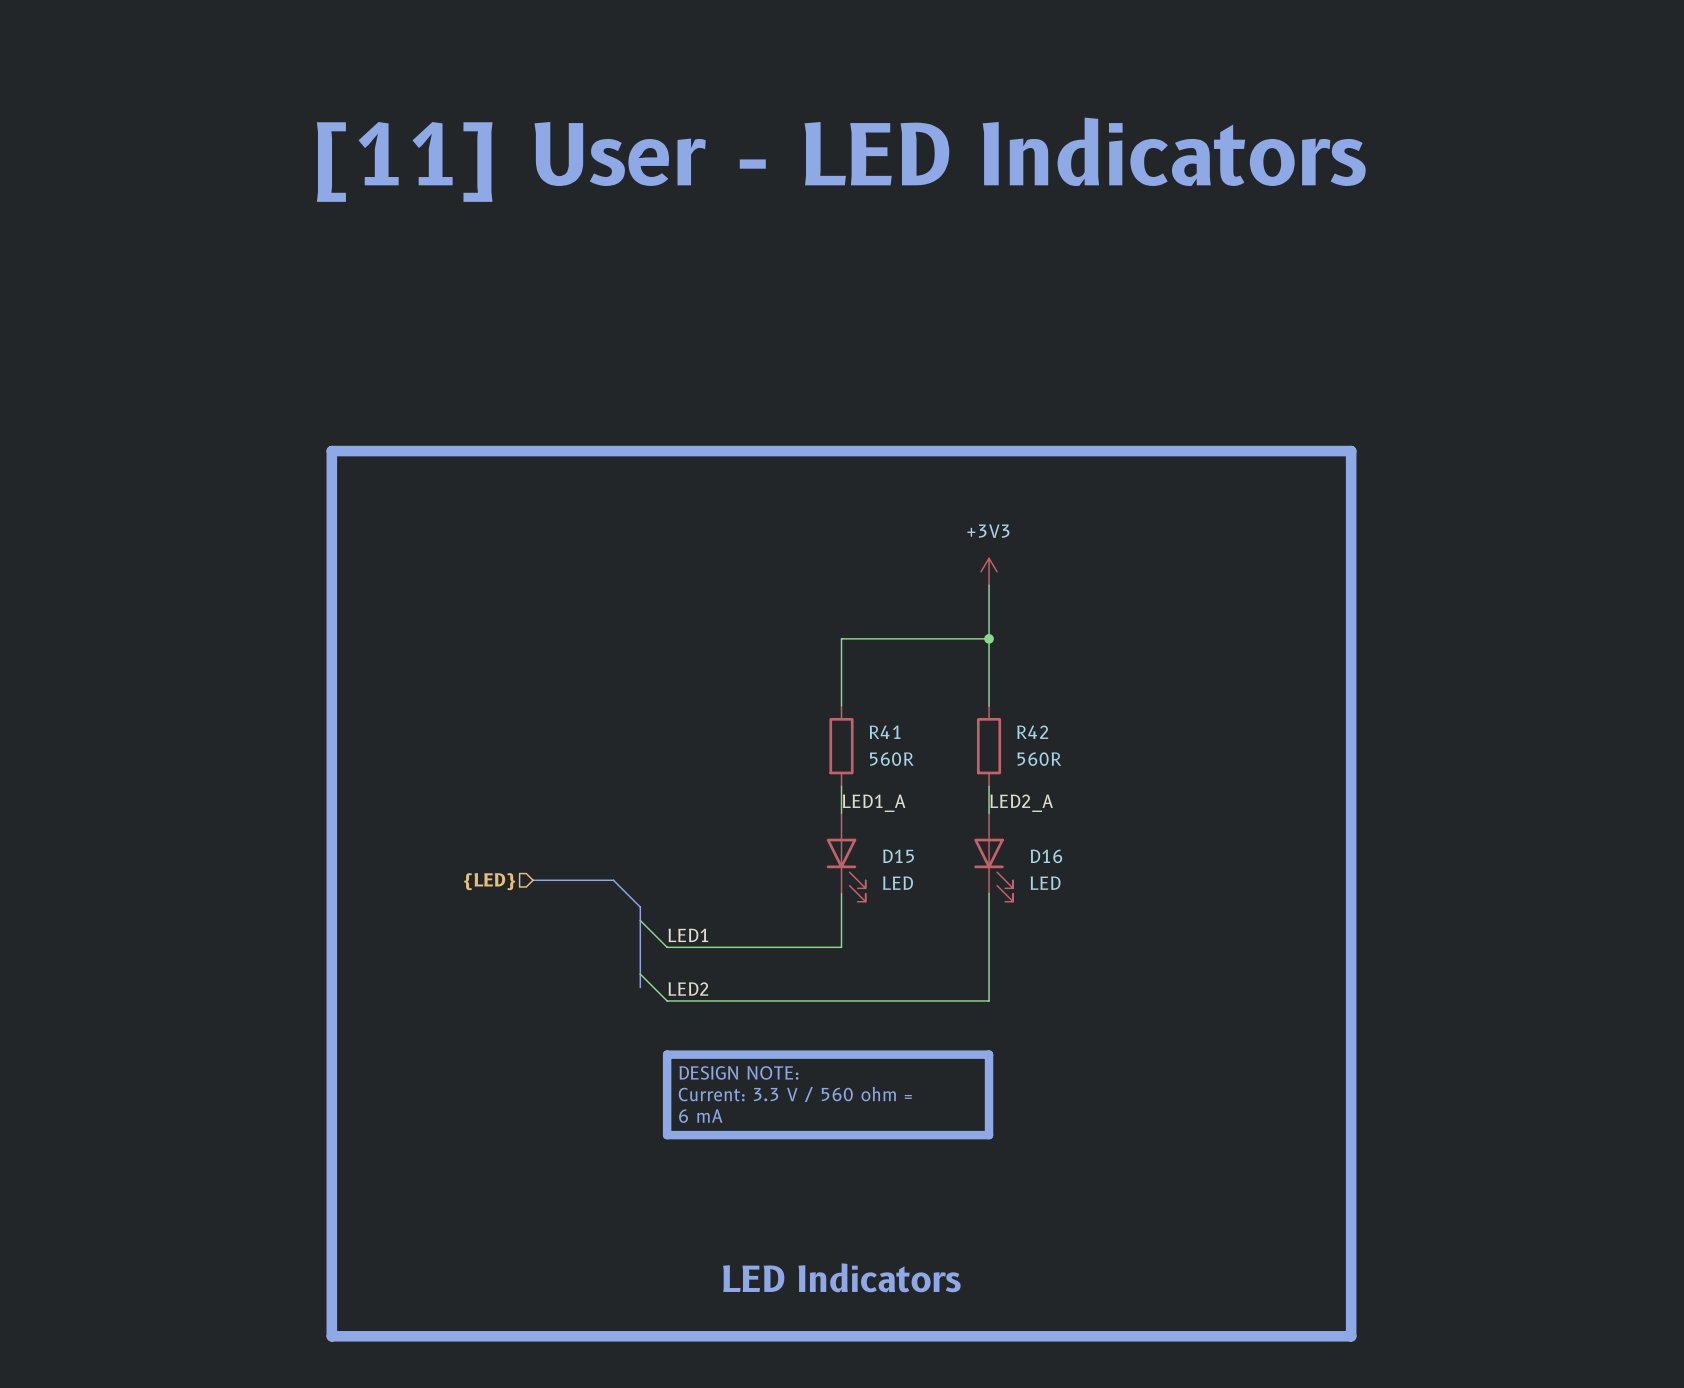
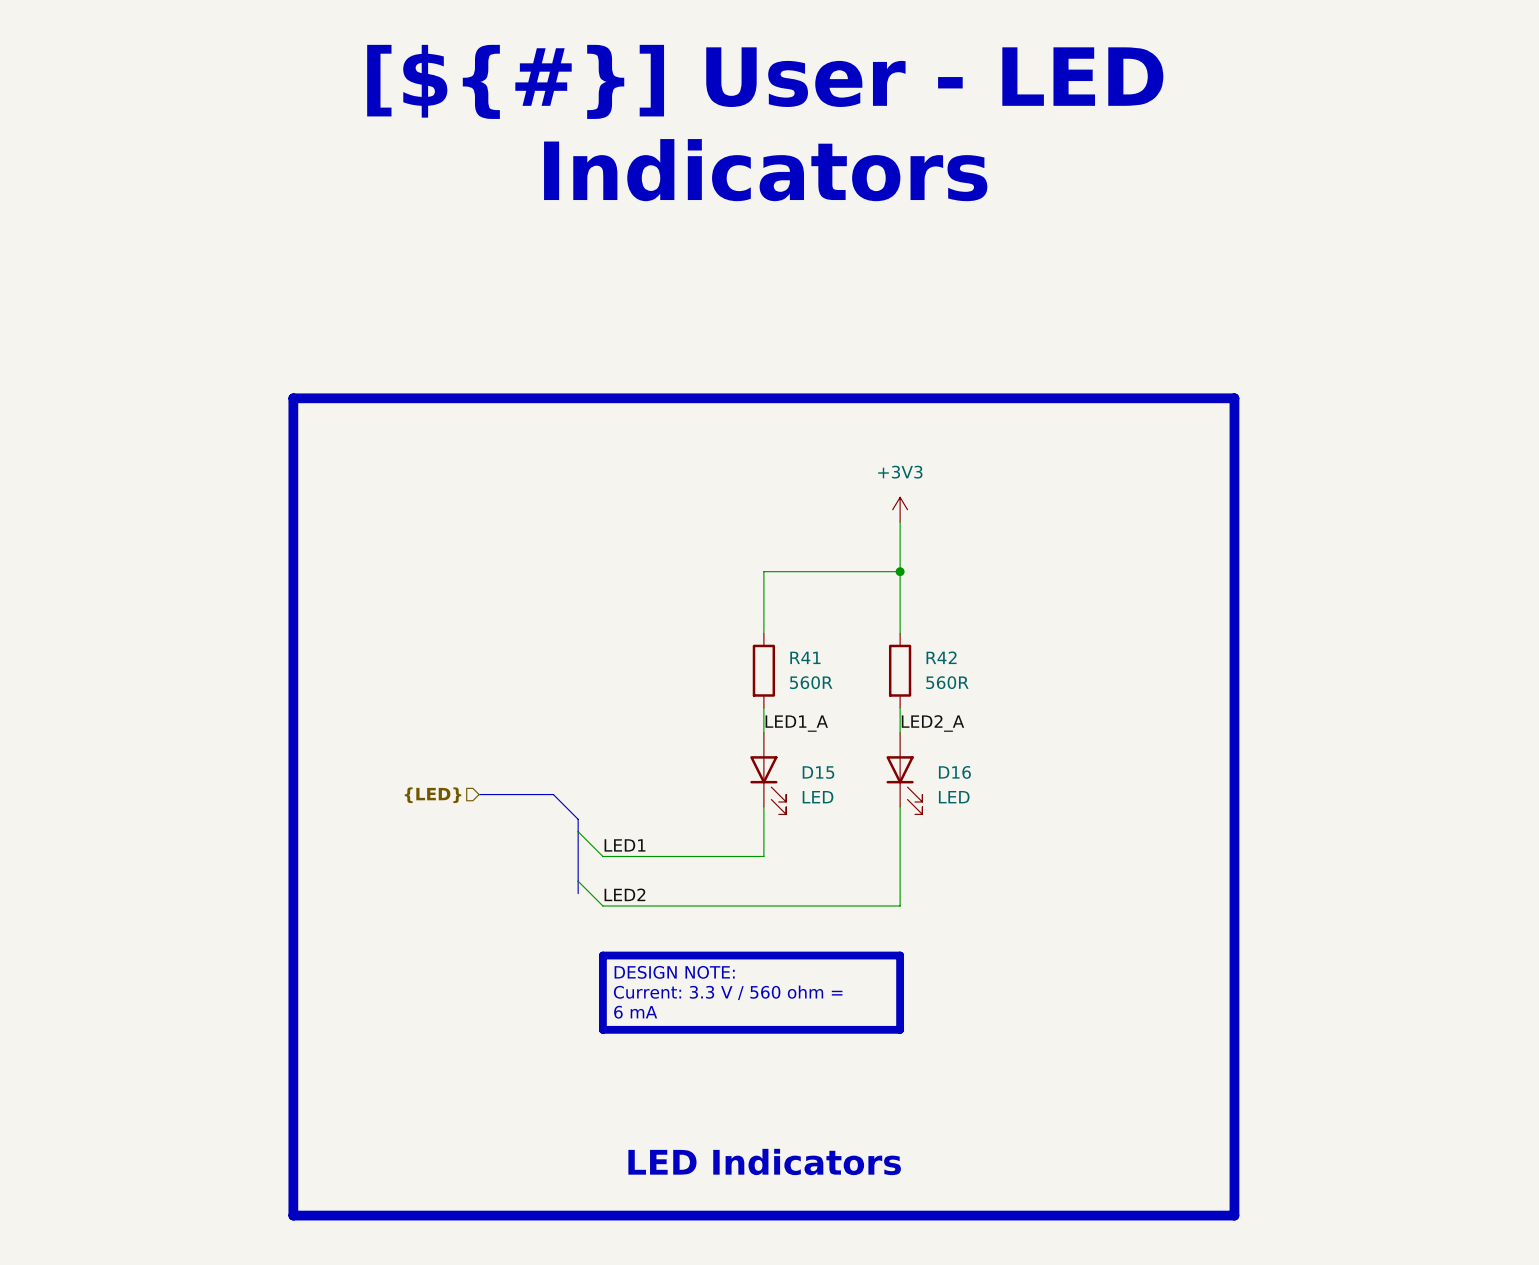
text: [11] User - LED Indicators (841, 159) -> [${#}] User - LED (765, 81)
text: none -> Indicators (765, 170)

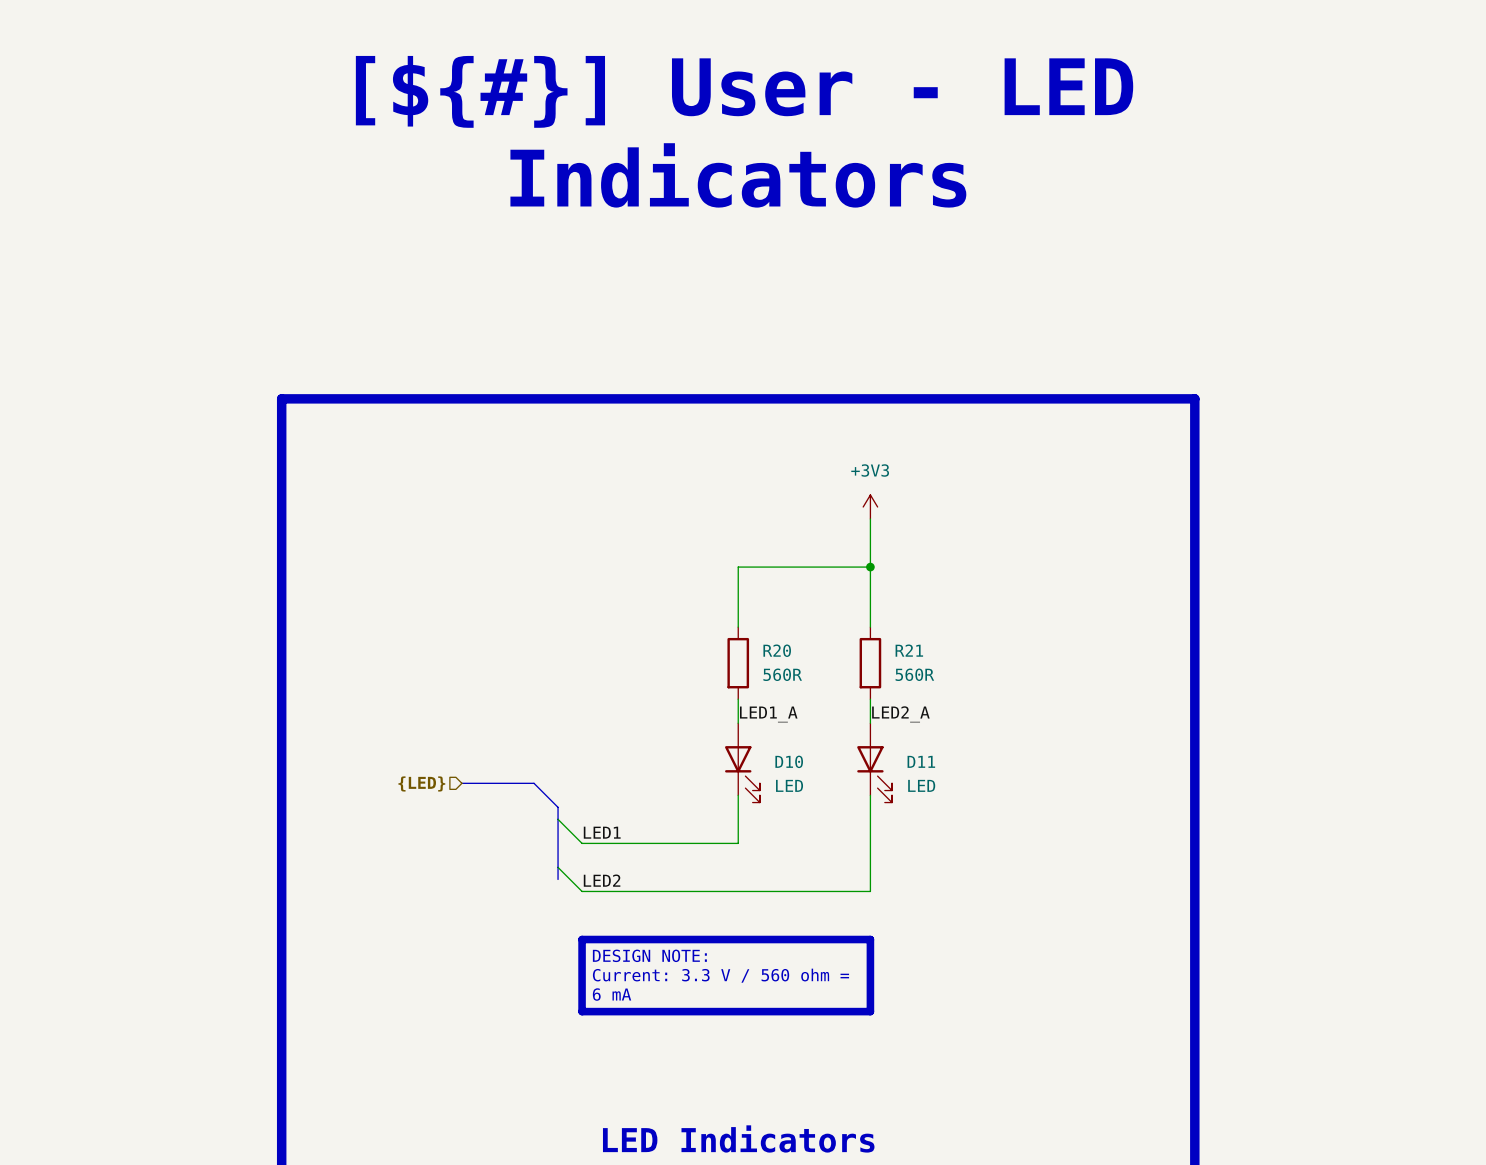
R41 name: R41 (805, 657) -> R20 (777, 650)
R42 name: R42 (941, 657) -> R21 (909, 650)
D15 name: D15 (818, 772) -> D10 (789, 761)
D16 name: D16 (954, 772) -> D11 (921, 761)

